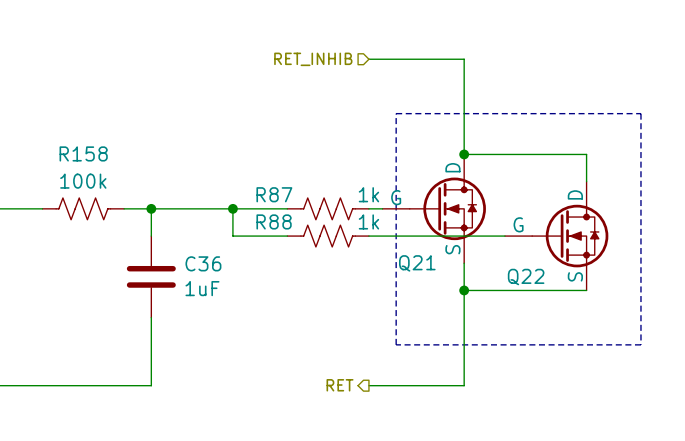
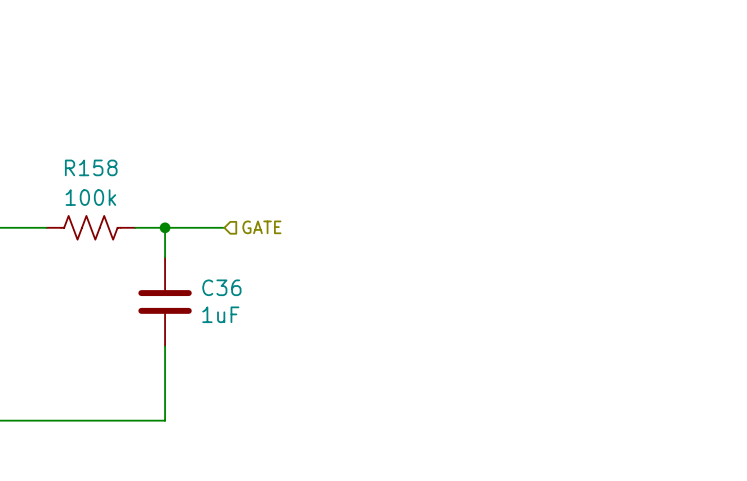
hierarchical label: RET_INHIB (313, 59) -> none
wire: (368, 59) (464, 59) (464, 154) (586, 154) (586, 181) -> none
line: (396, 113) (640, 113) (640, 344) (396, 344) (396, 113) -> none
junction: (464, 154) -> none
wire: (205, 208) (287, 208) -> none
wire: (232, 208) (232, 236) (287, 236) -> none
junction: (232, 208) -> none
hierarchical label: none -> GATE (261, 227)
R87: 1k (328, 208) -> none
wire: (368, 208) (382, 208) -> none
Q21: (434, 208) -> none
R88: 1k (328, 236) -> none
wire: (368, 236) (504, 236) -> none
Q22: (556, 236) -> none
wire: (464, 263) (464, 385) (368, 385) -> none
wire: (464, 290) (586, 290) -> none
junction: (464, 290) -> none
hierarchical label: RET (340, 385) -> none

